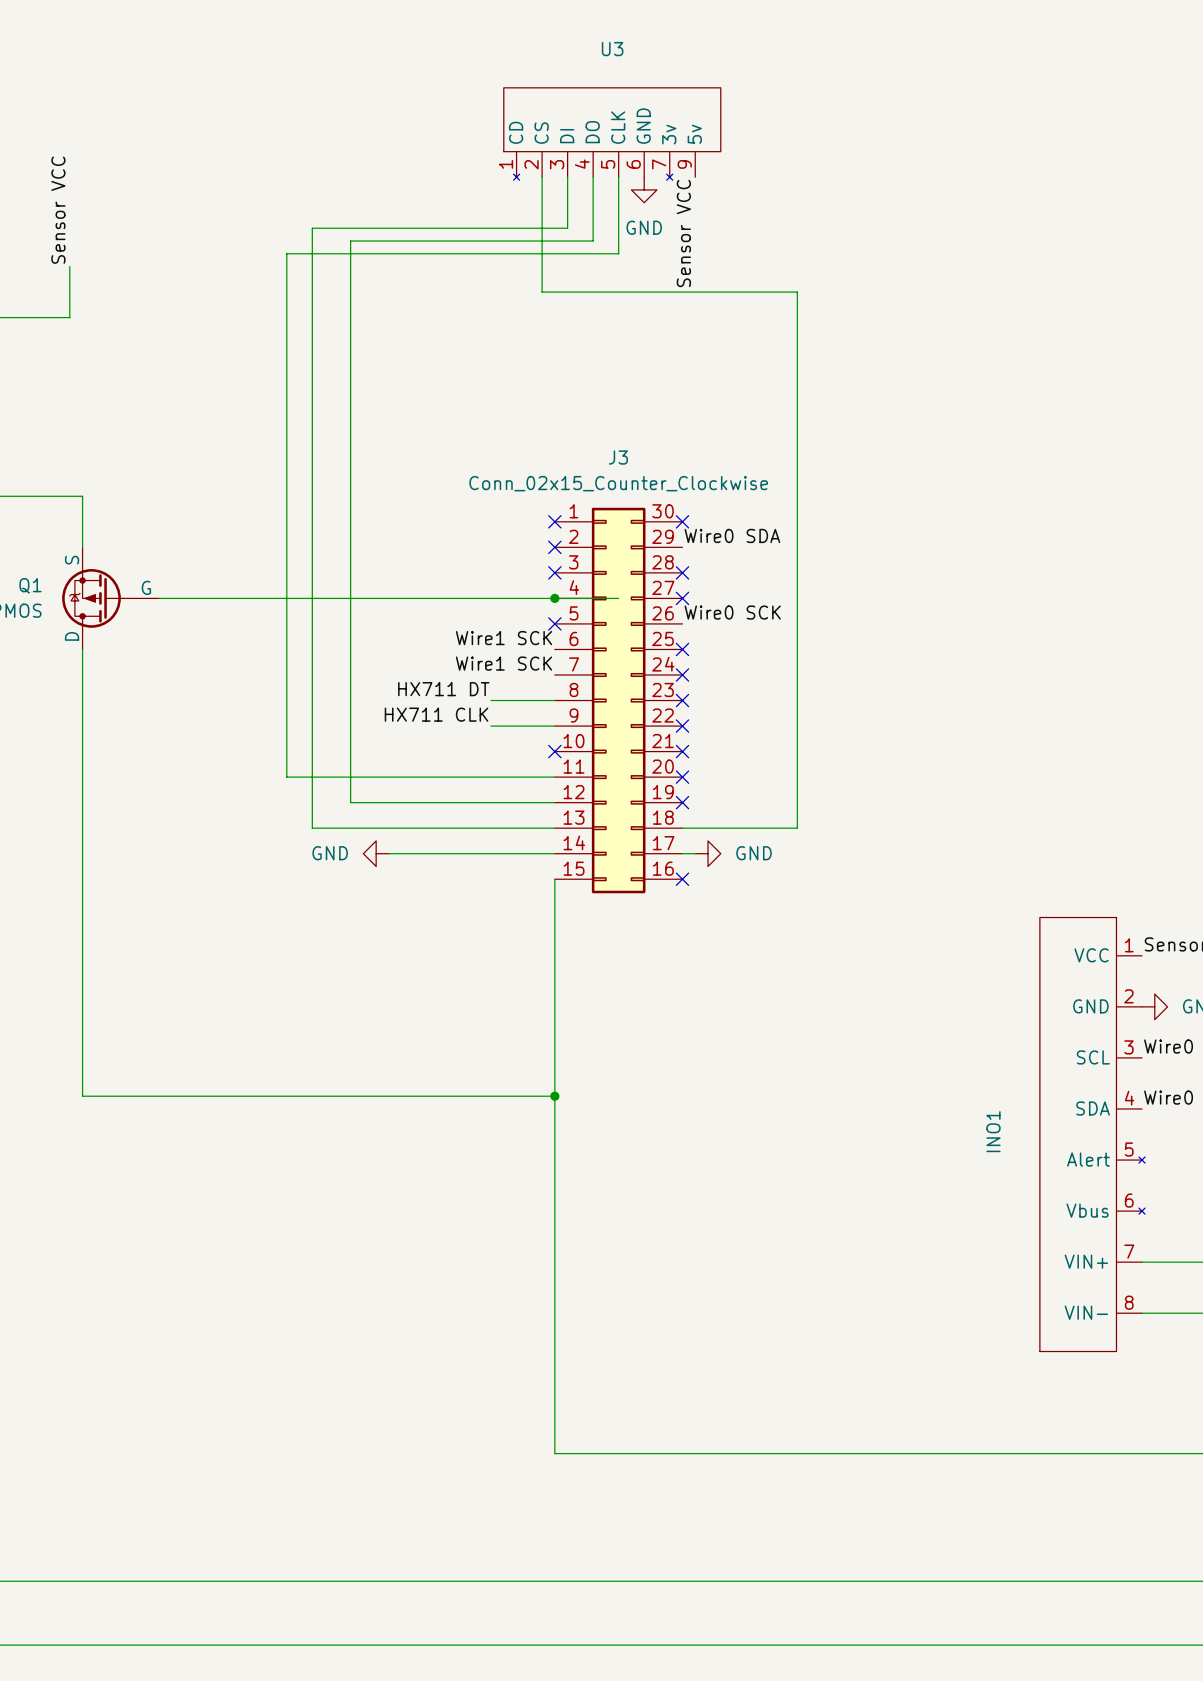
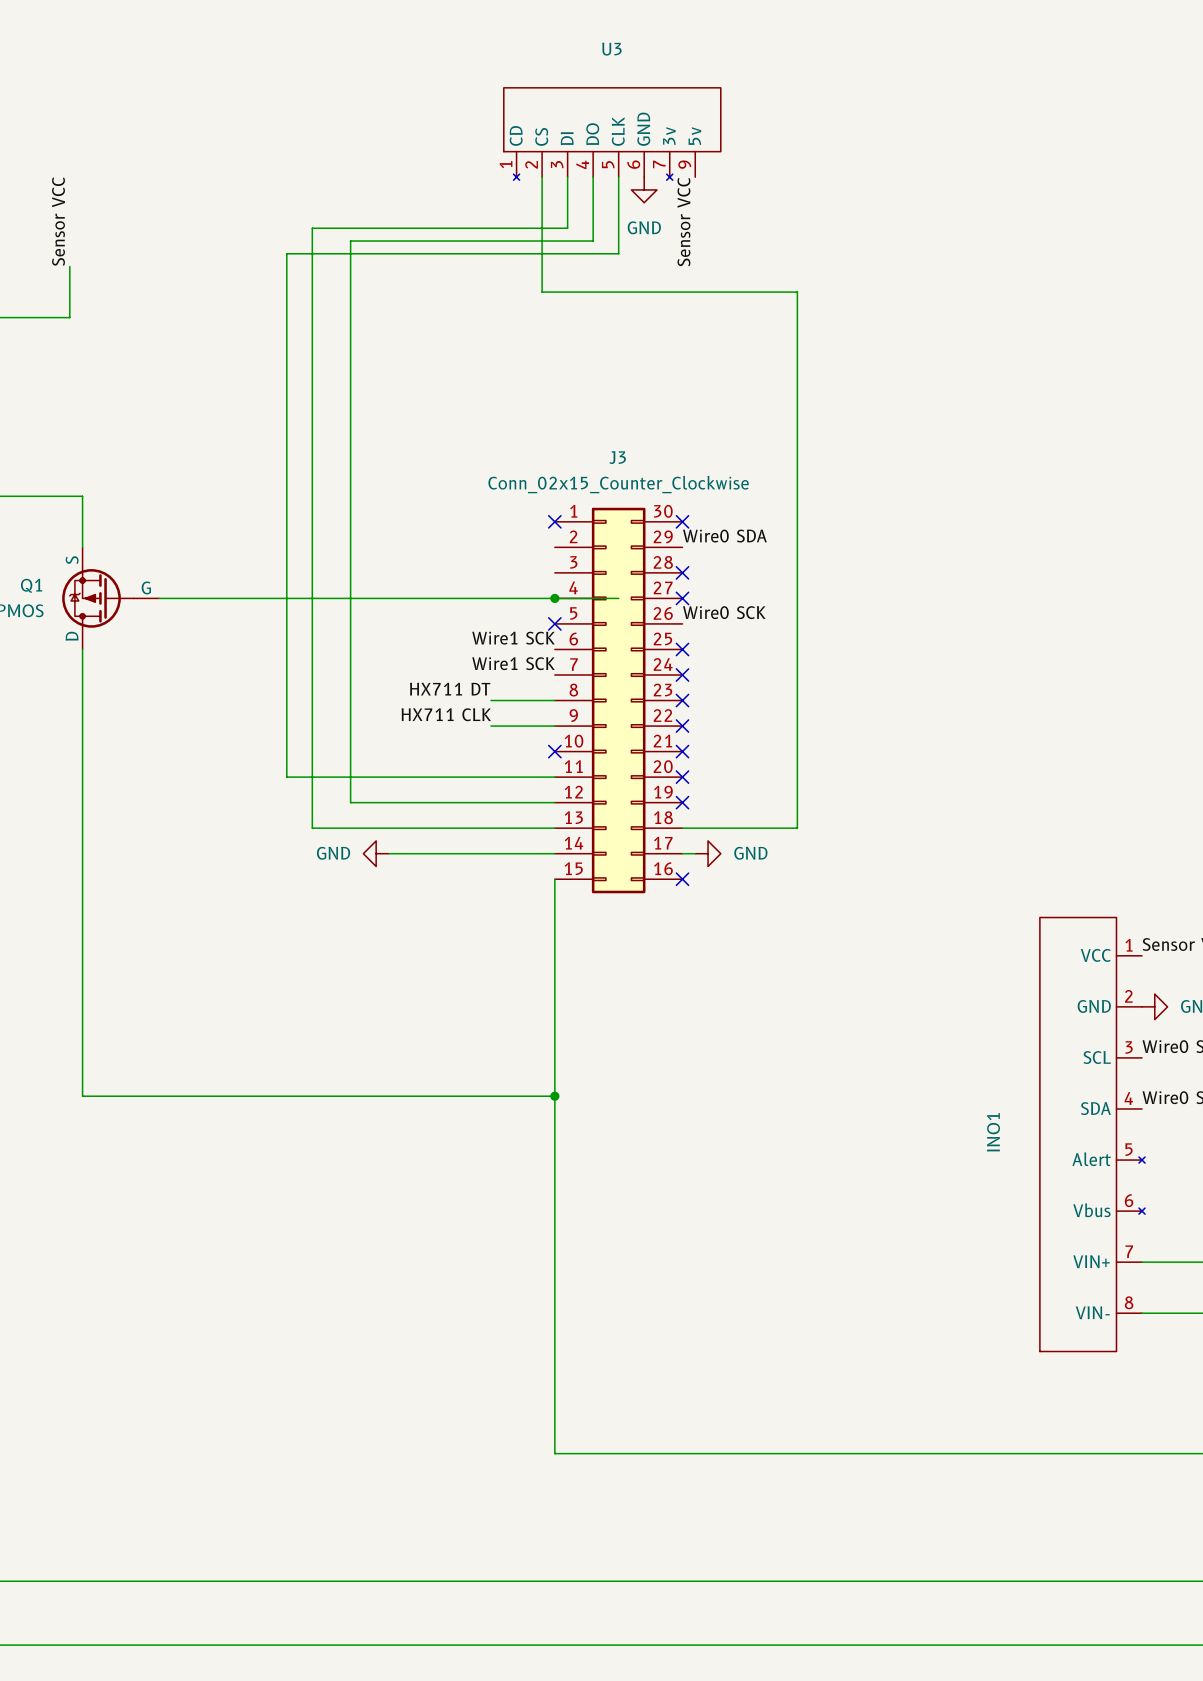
no-connect mark: (554, 547) -> none
no-connect mark: (554, 572) -> none

